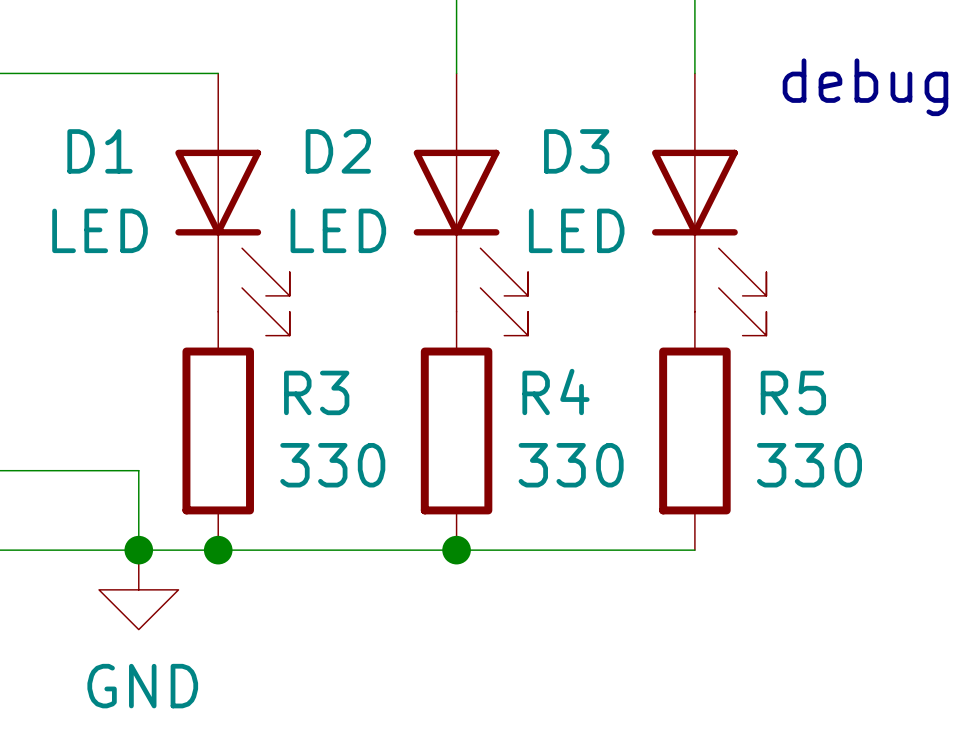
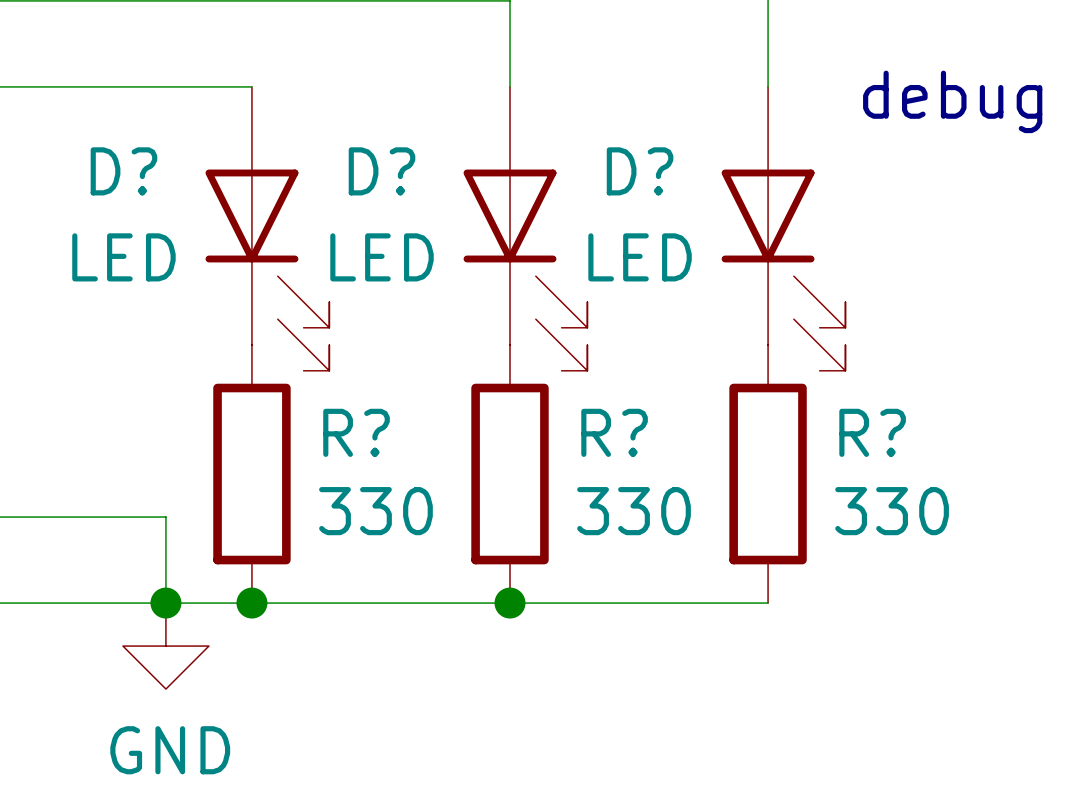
D1 name: D1 (100, 151) -> D? (123, 171)
D2 name: D2 (338, 151) -> D? (382, 171)
D3 name: D3 (576, 151) -> D? (640, 171)
R4 name: R4 (555, 391) -> R? (614, 432)
R3 name: R3 (316, 392) -> R? (356, 432)
R5 name: R5 (793, 392) -> R? (872, 432)

